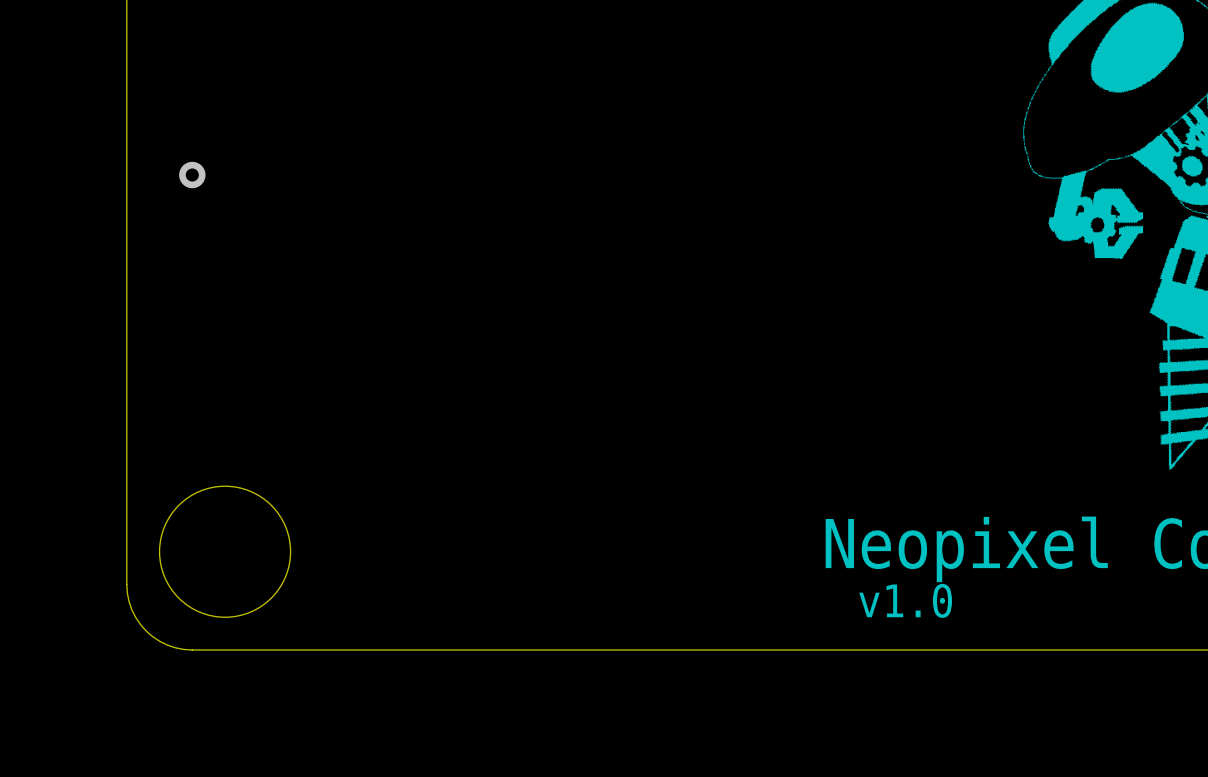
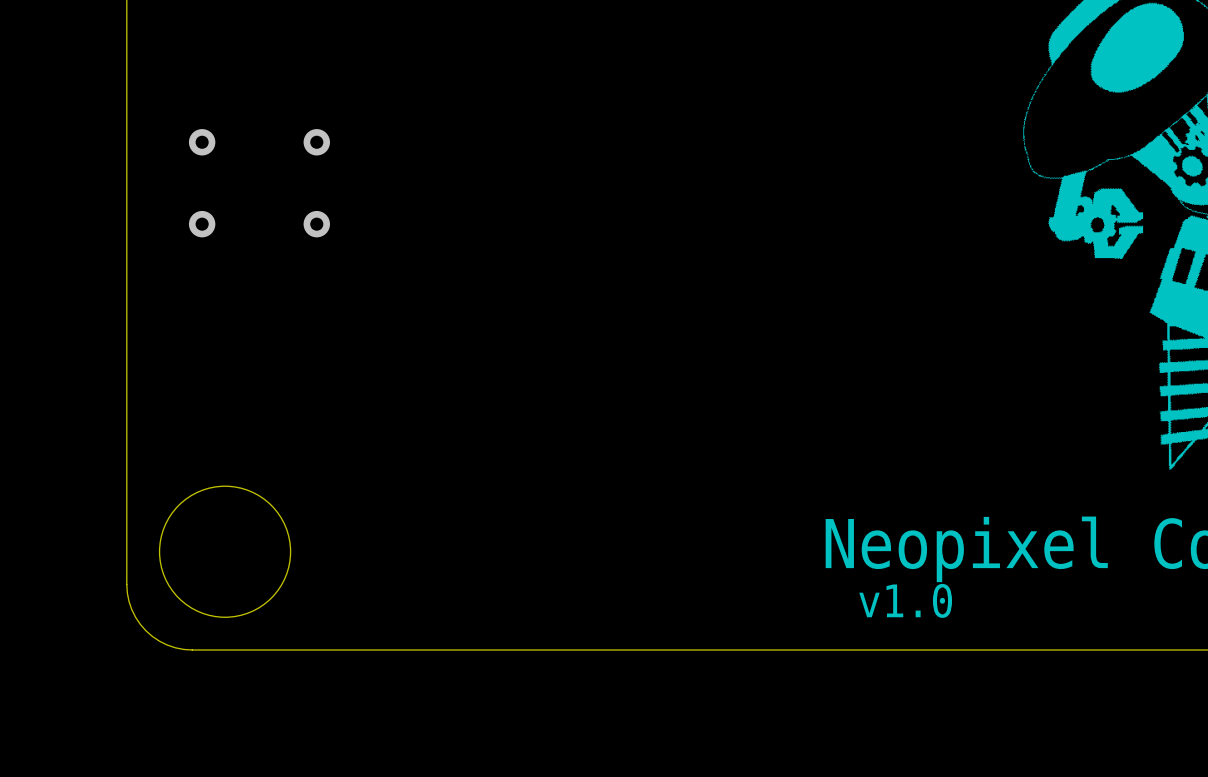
via: none -> (202, 142)
via: none -> (316, 142)
via: (192, 175) -> none
via: none -> (202, 224)
via: none -> (316, 224)

